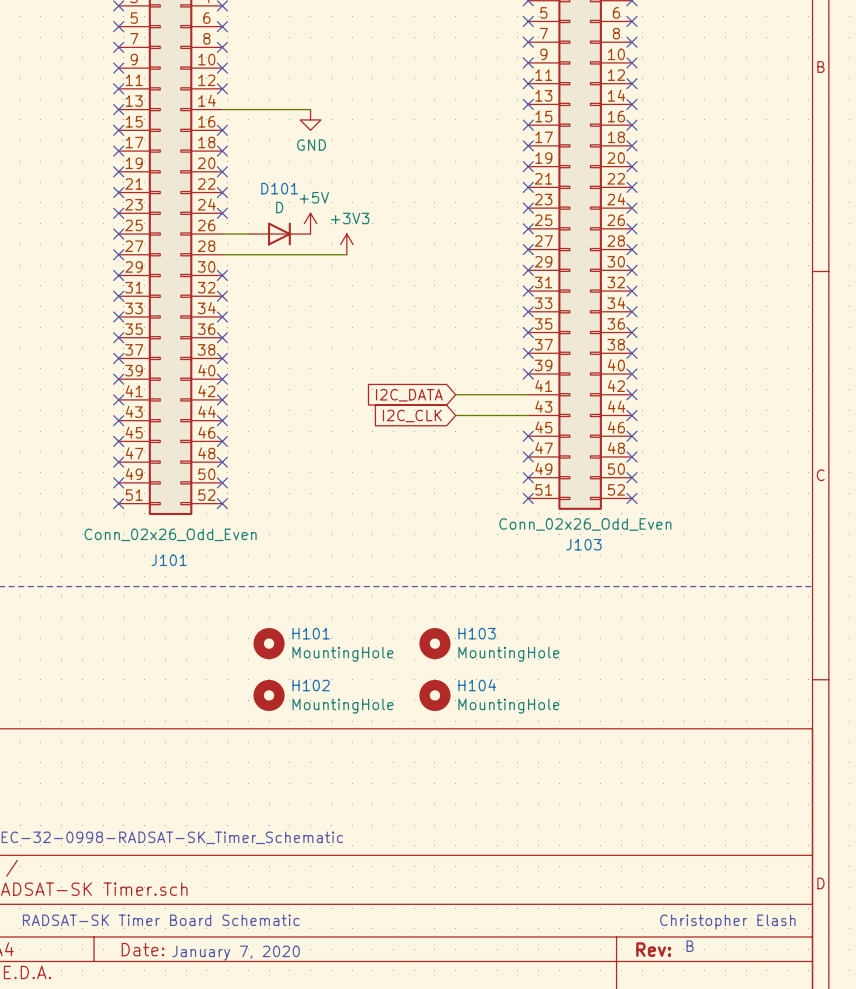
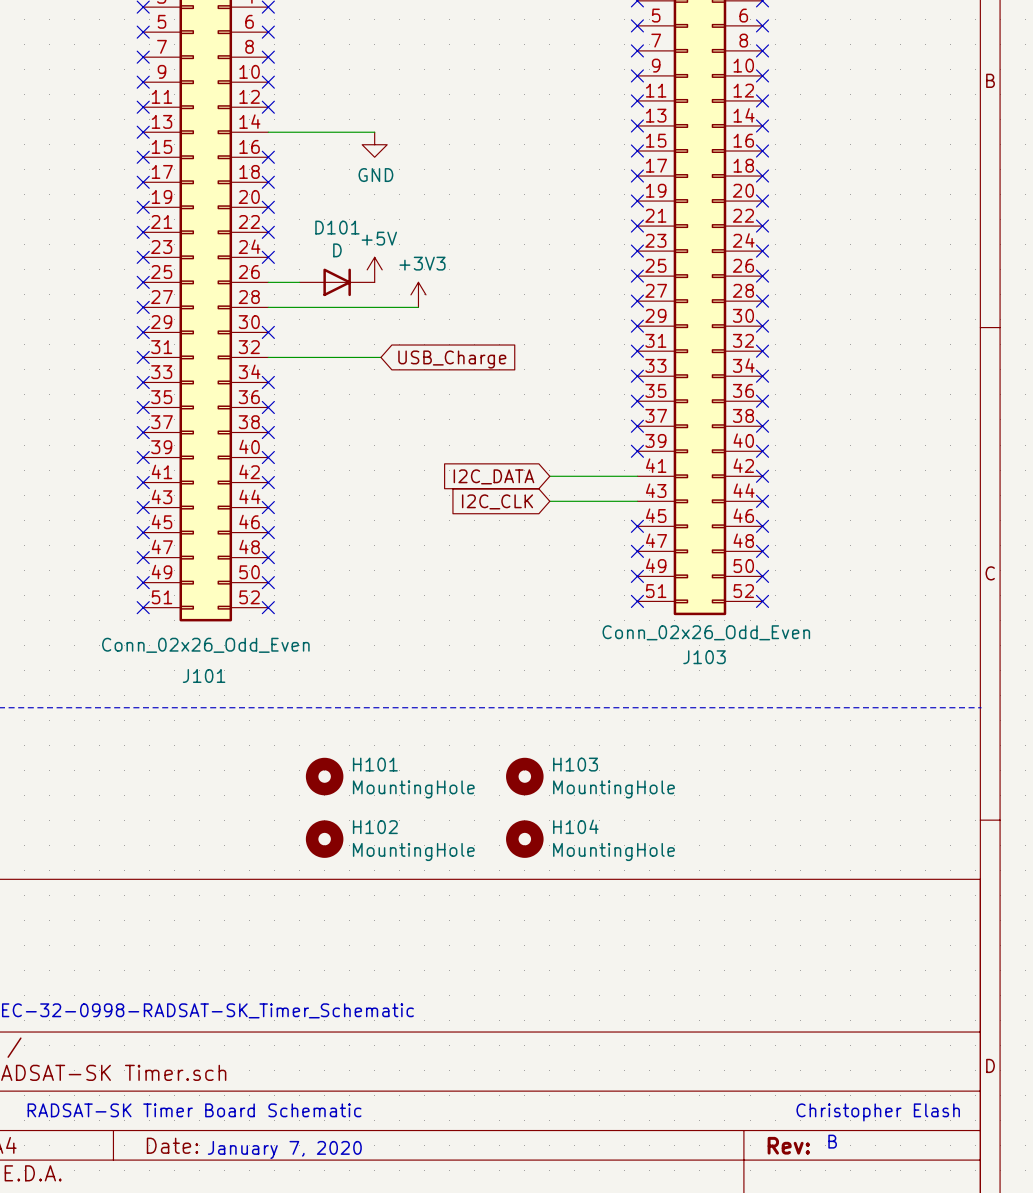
wire: none -> (268, 357) (380, 357)
no-connect mark: (222, 296) -> none
global label: none -> USB_Charge (452, 359)

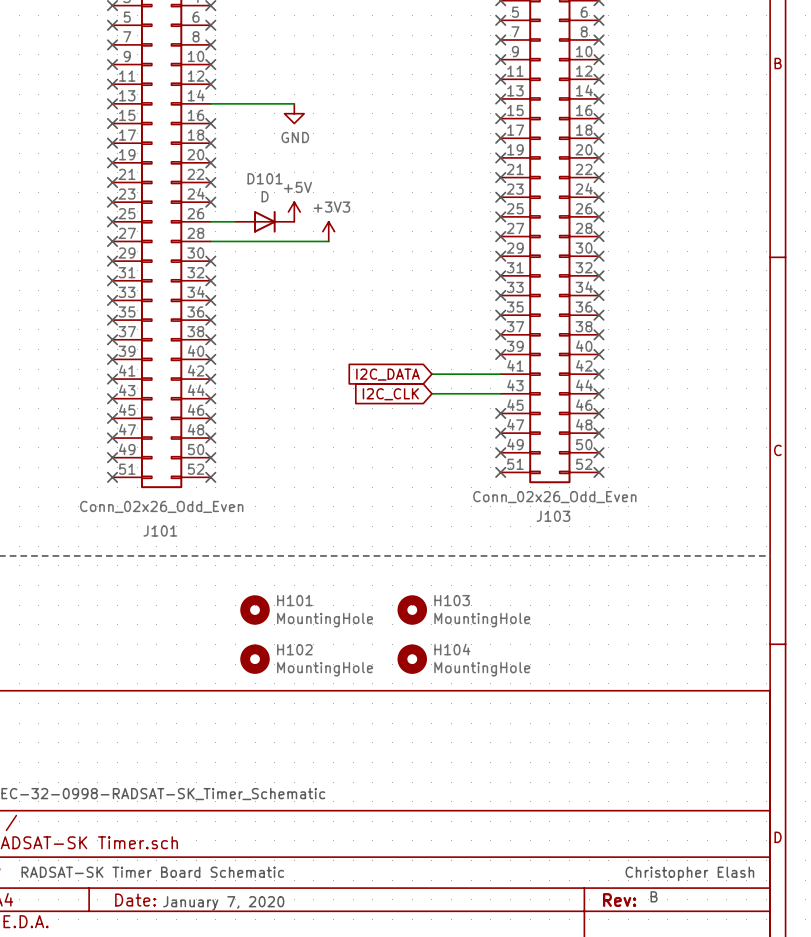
wire: (268, 357) (380, 357) -> none
no-connect mark: none -> (210, 280)
global label: USB_Charge (452, 359) -> none

